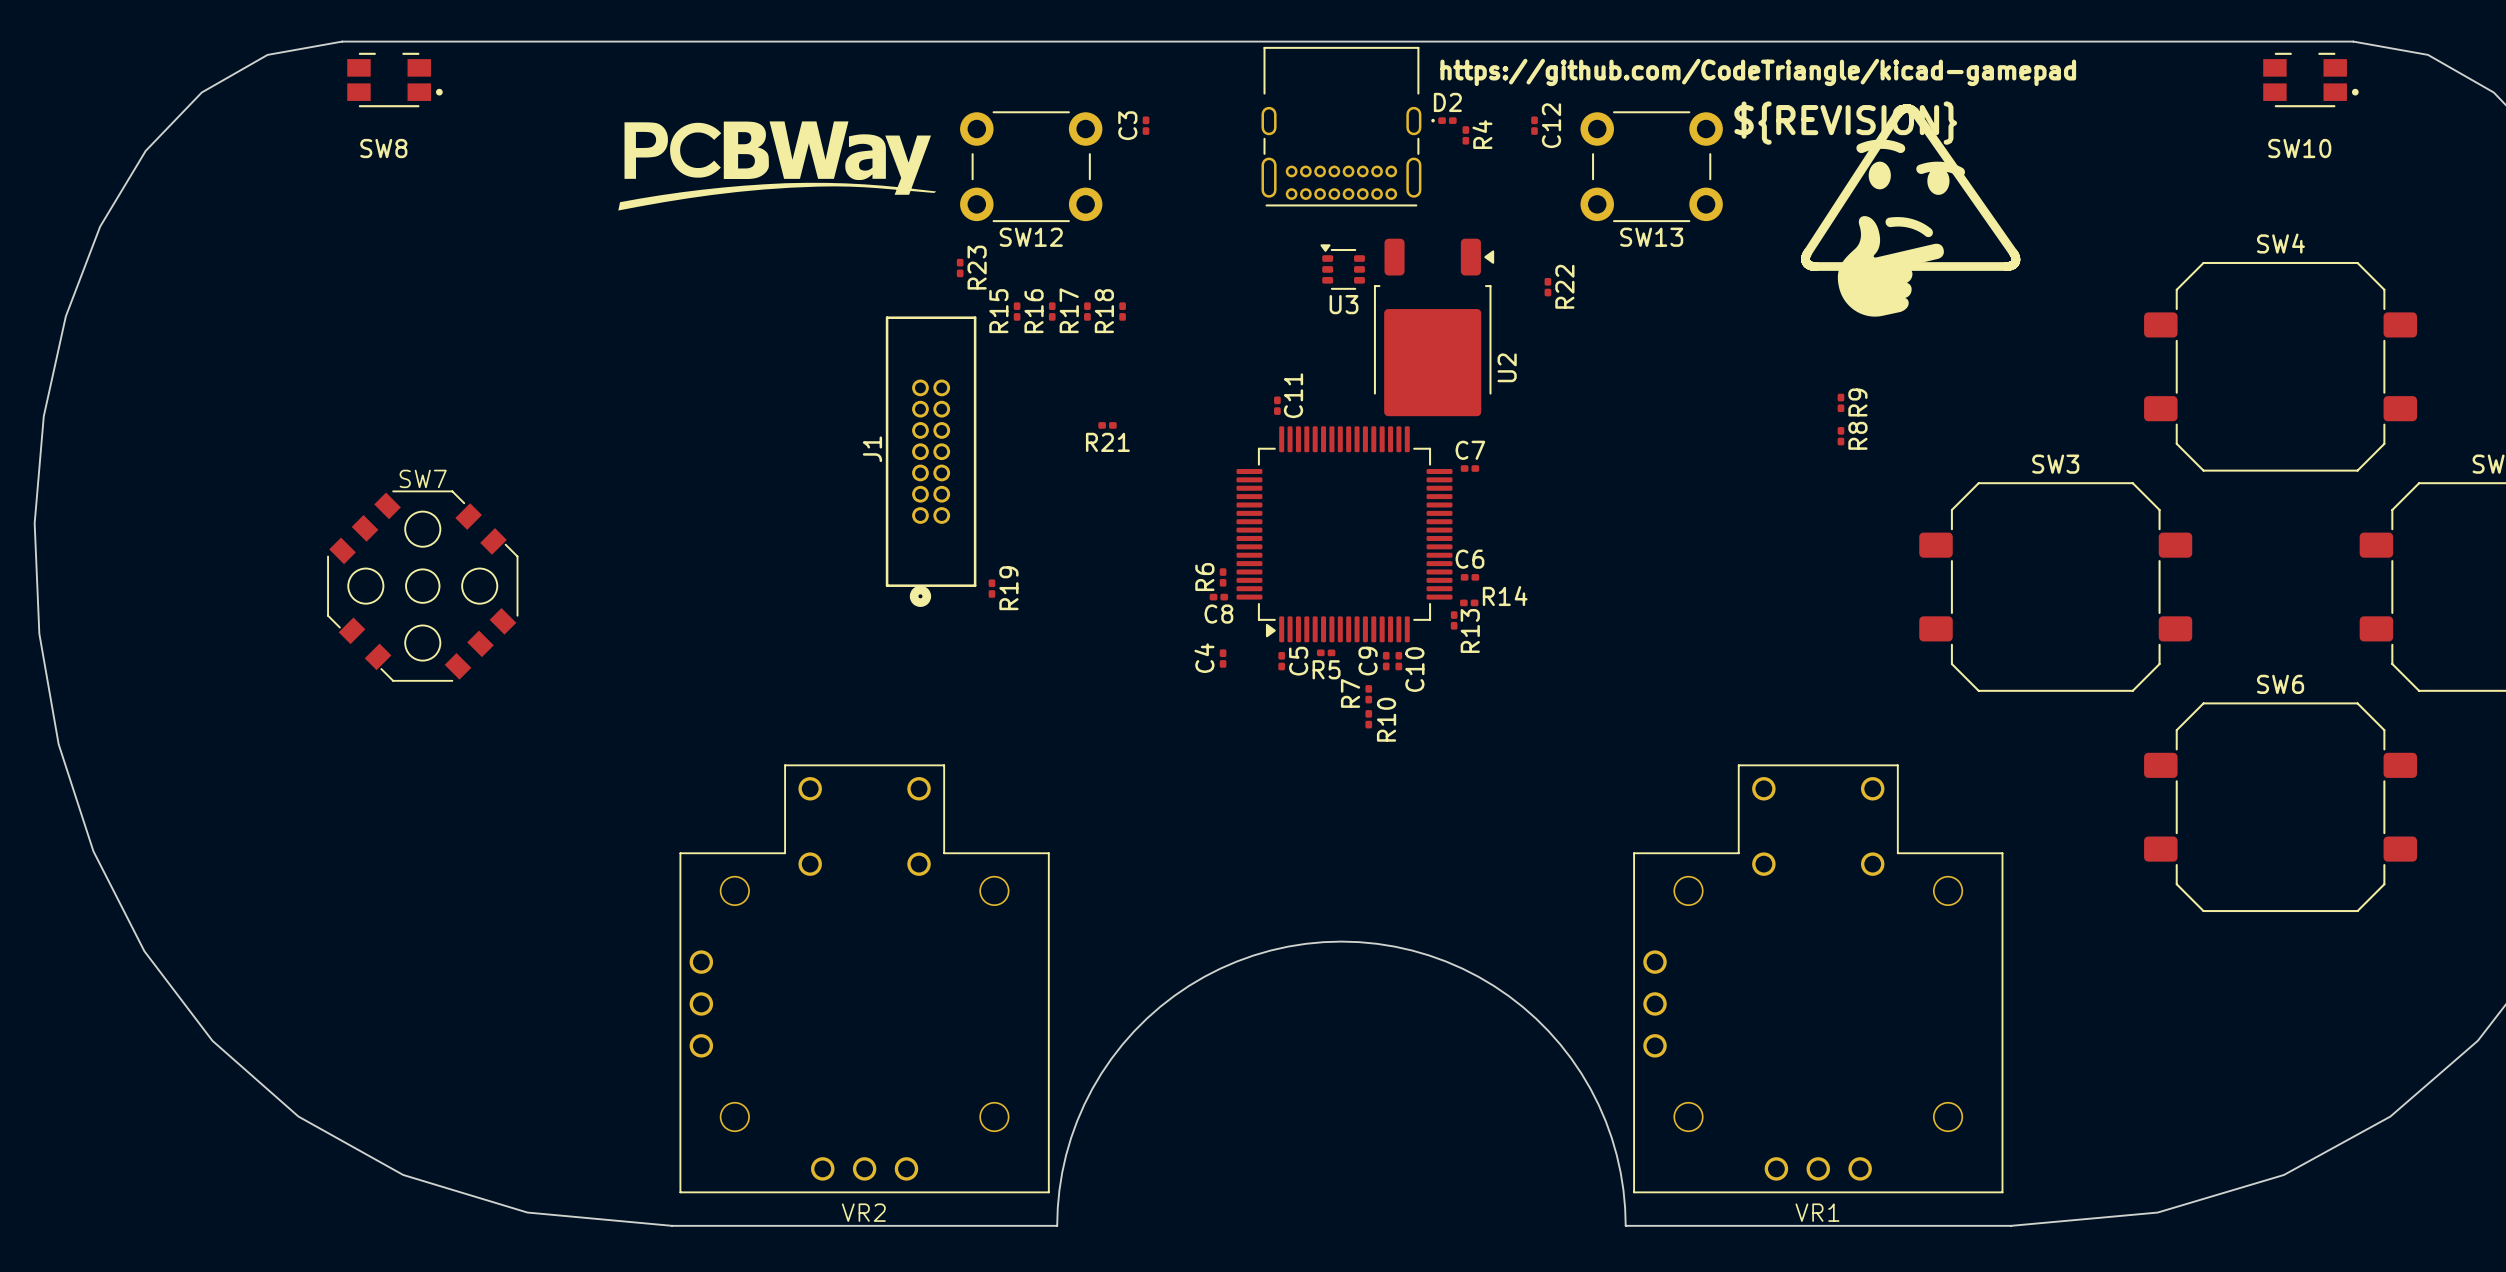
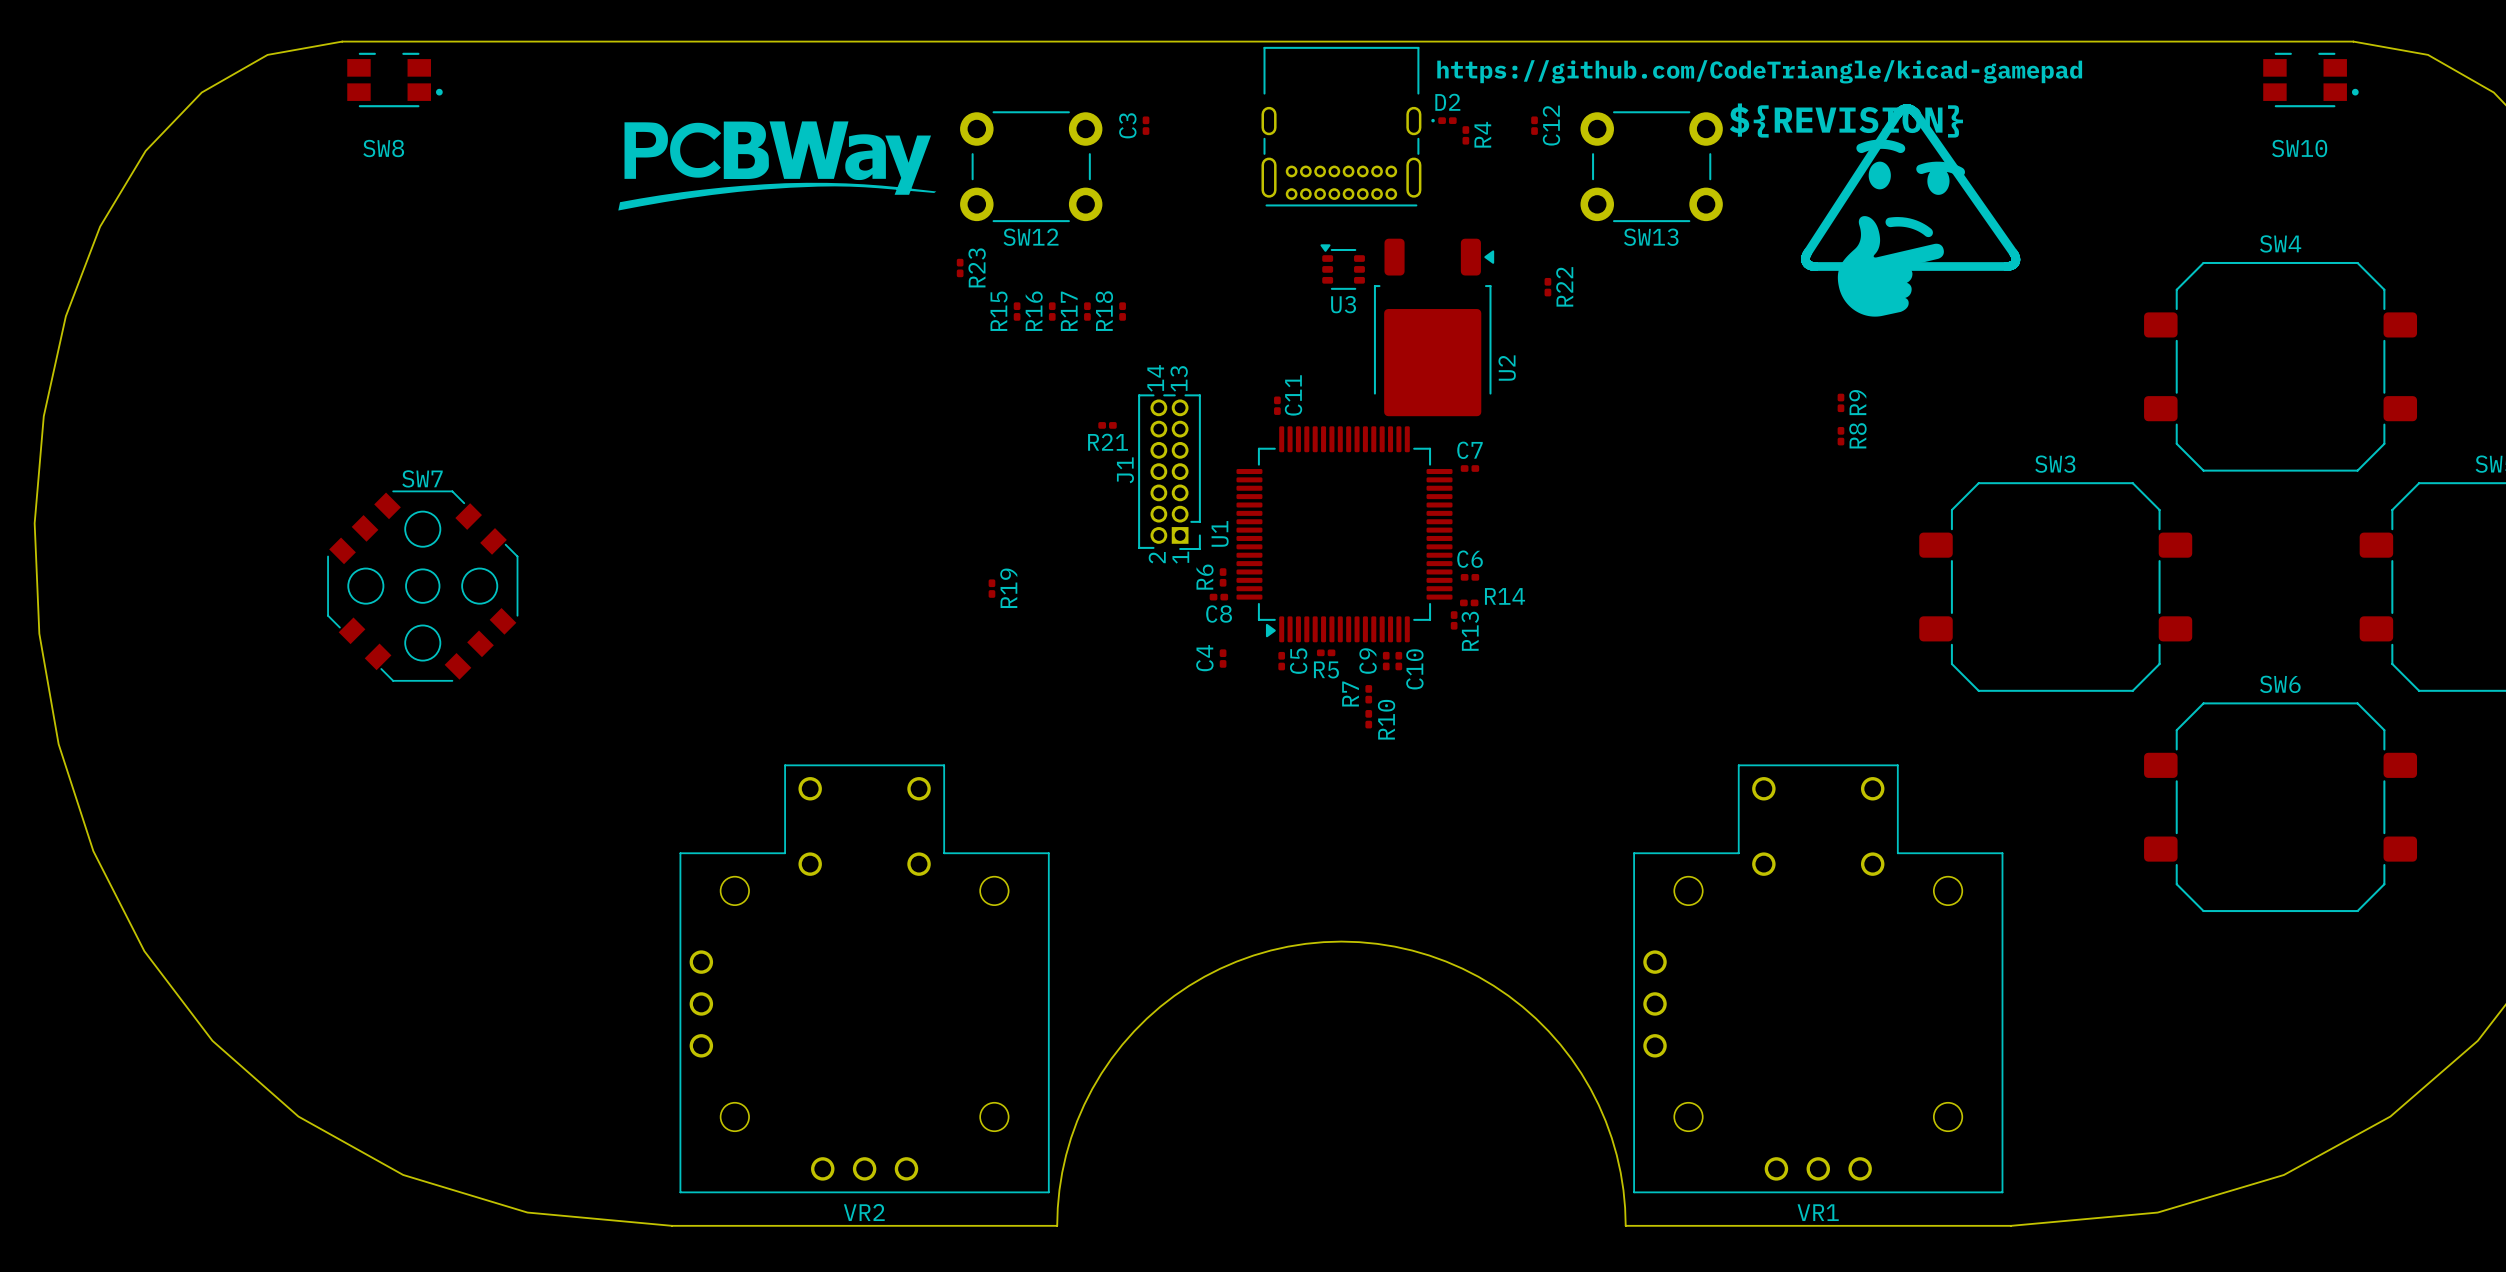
J1 footprint: [885, 316, 977, 607] -> [1138, 394, 1201, 551]
text: none -> 14 (1155, 378)
text: none -> 13 (1179, 378)
U1 name: none -> U1 (1220, 533)
text: none -> 1 (1180, 557)
text: none -> 2 (1157, 557)

